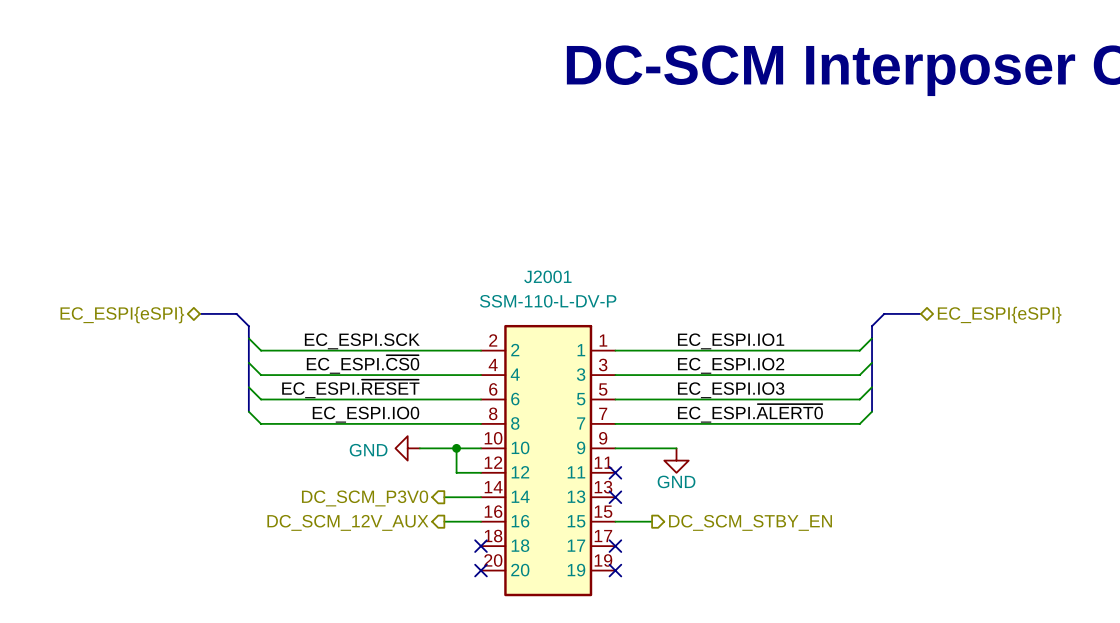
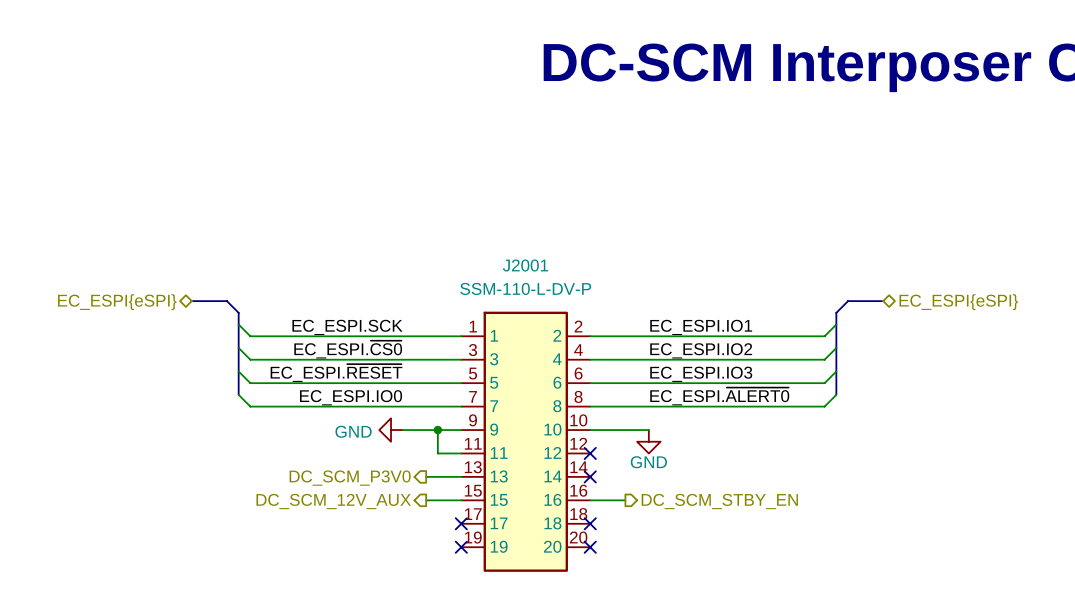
J2001 flip: as is (548, 460) -> left-right (525, 441)

